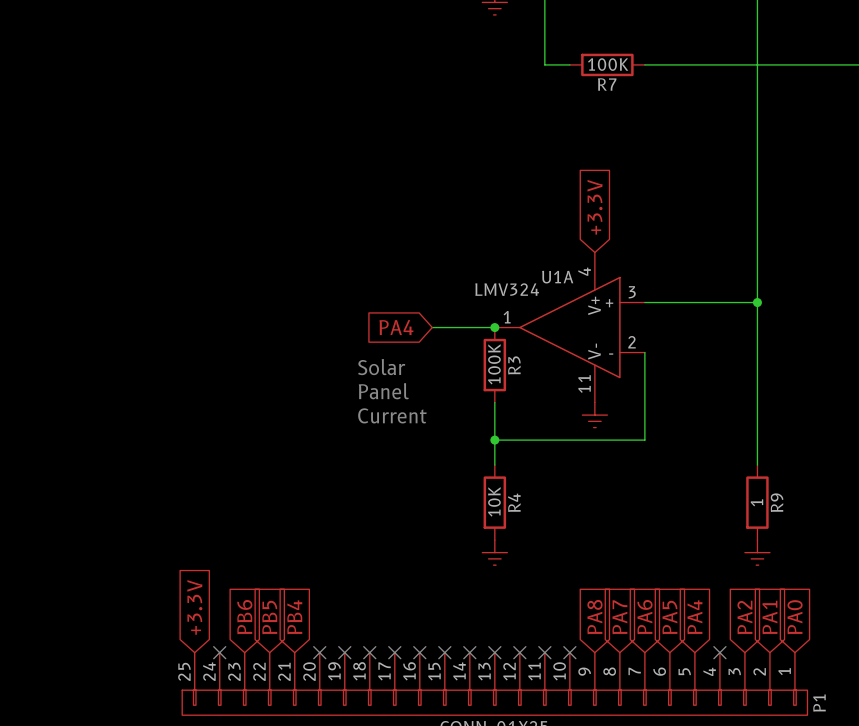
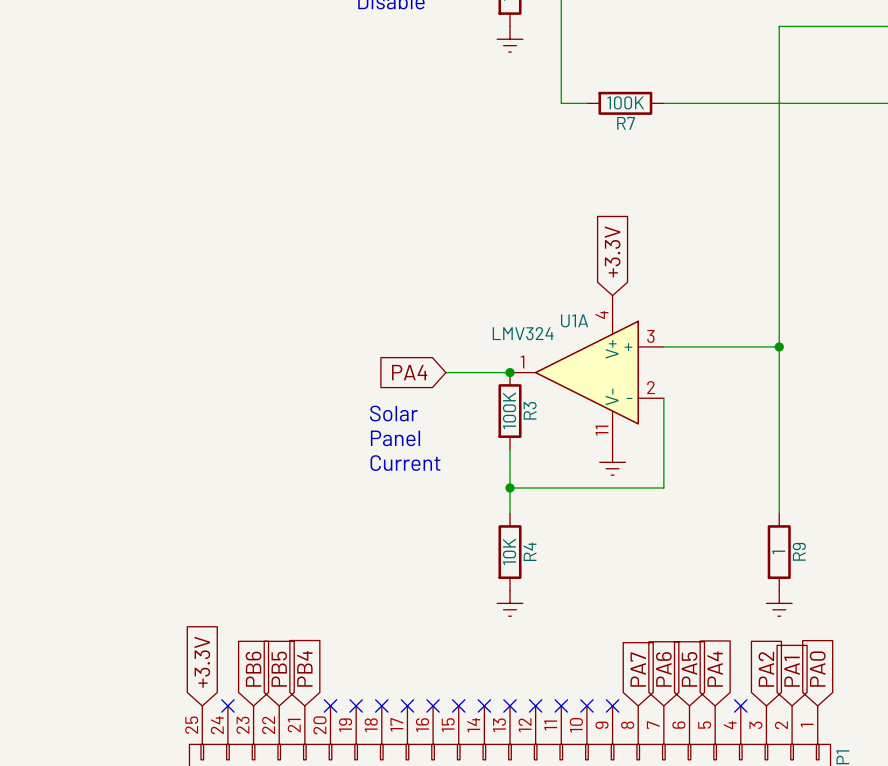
global label: PA8 (594, 617) -> none
no-connect mark: none -> (612, 705)

